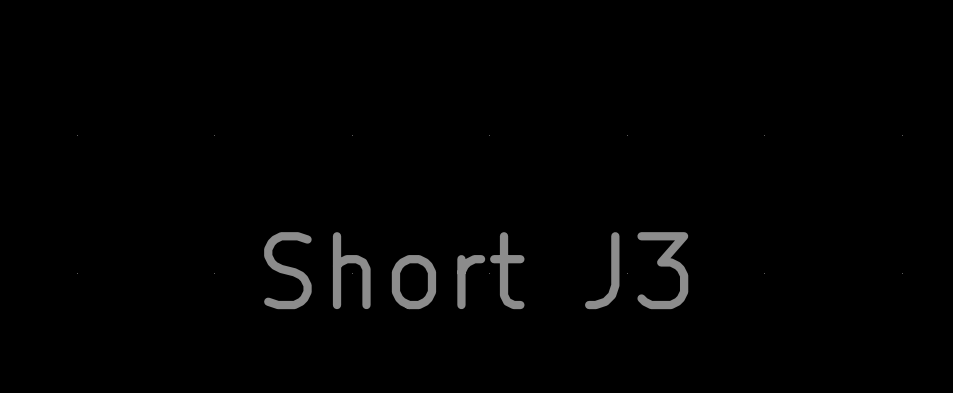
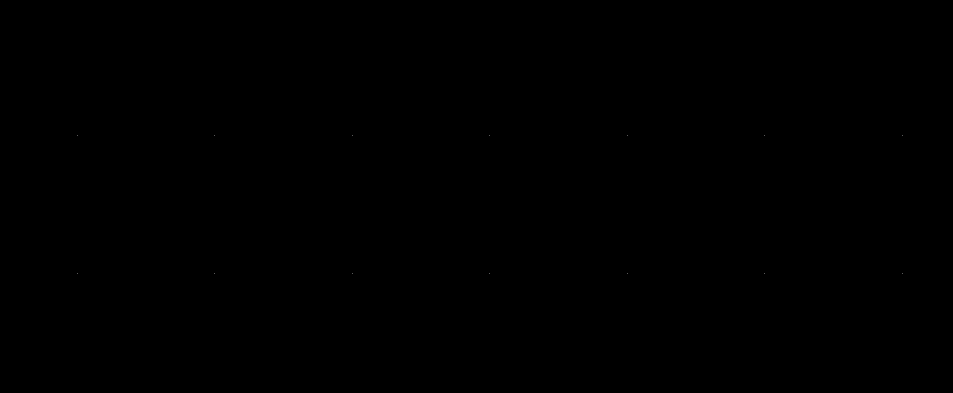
text: Short J3 (476, 270) -> none

